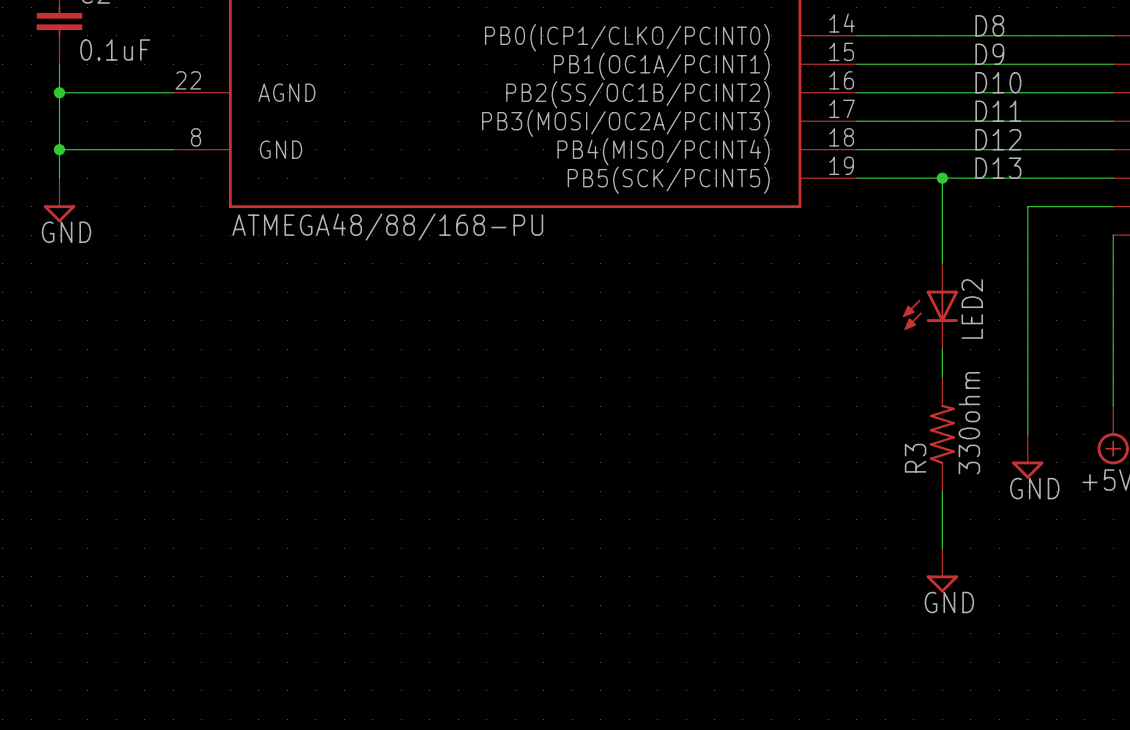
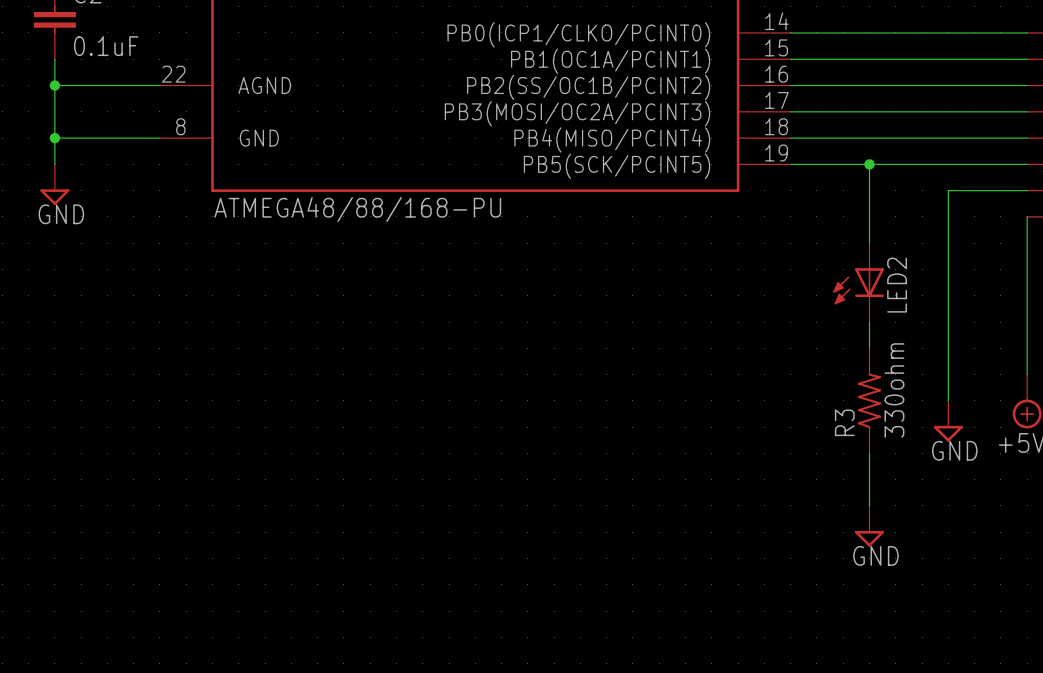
label: D8 (989, 25) -> none
label: D9 (989, 54) -> none
label: D10 (998, 82) -> none
label: D11 (998, 111) -> none
label: D12 (998, 139) -> none
label: D13 (998, 168) -> none

